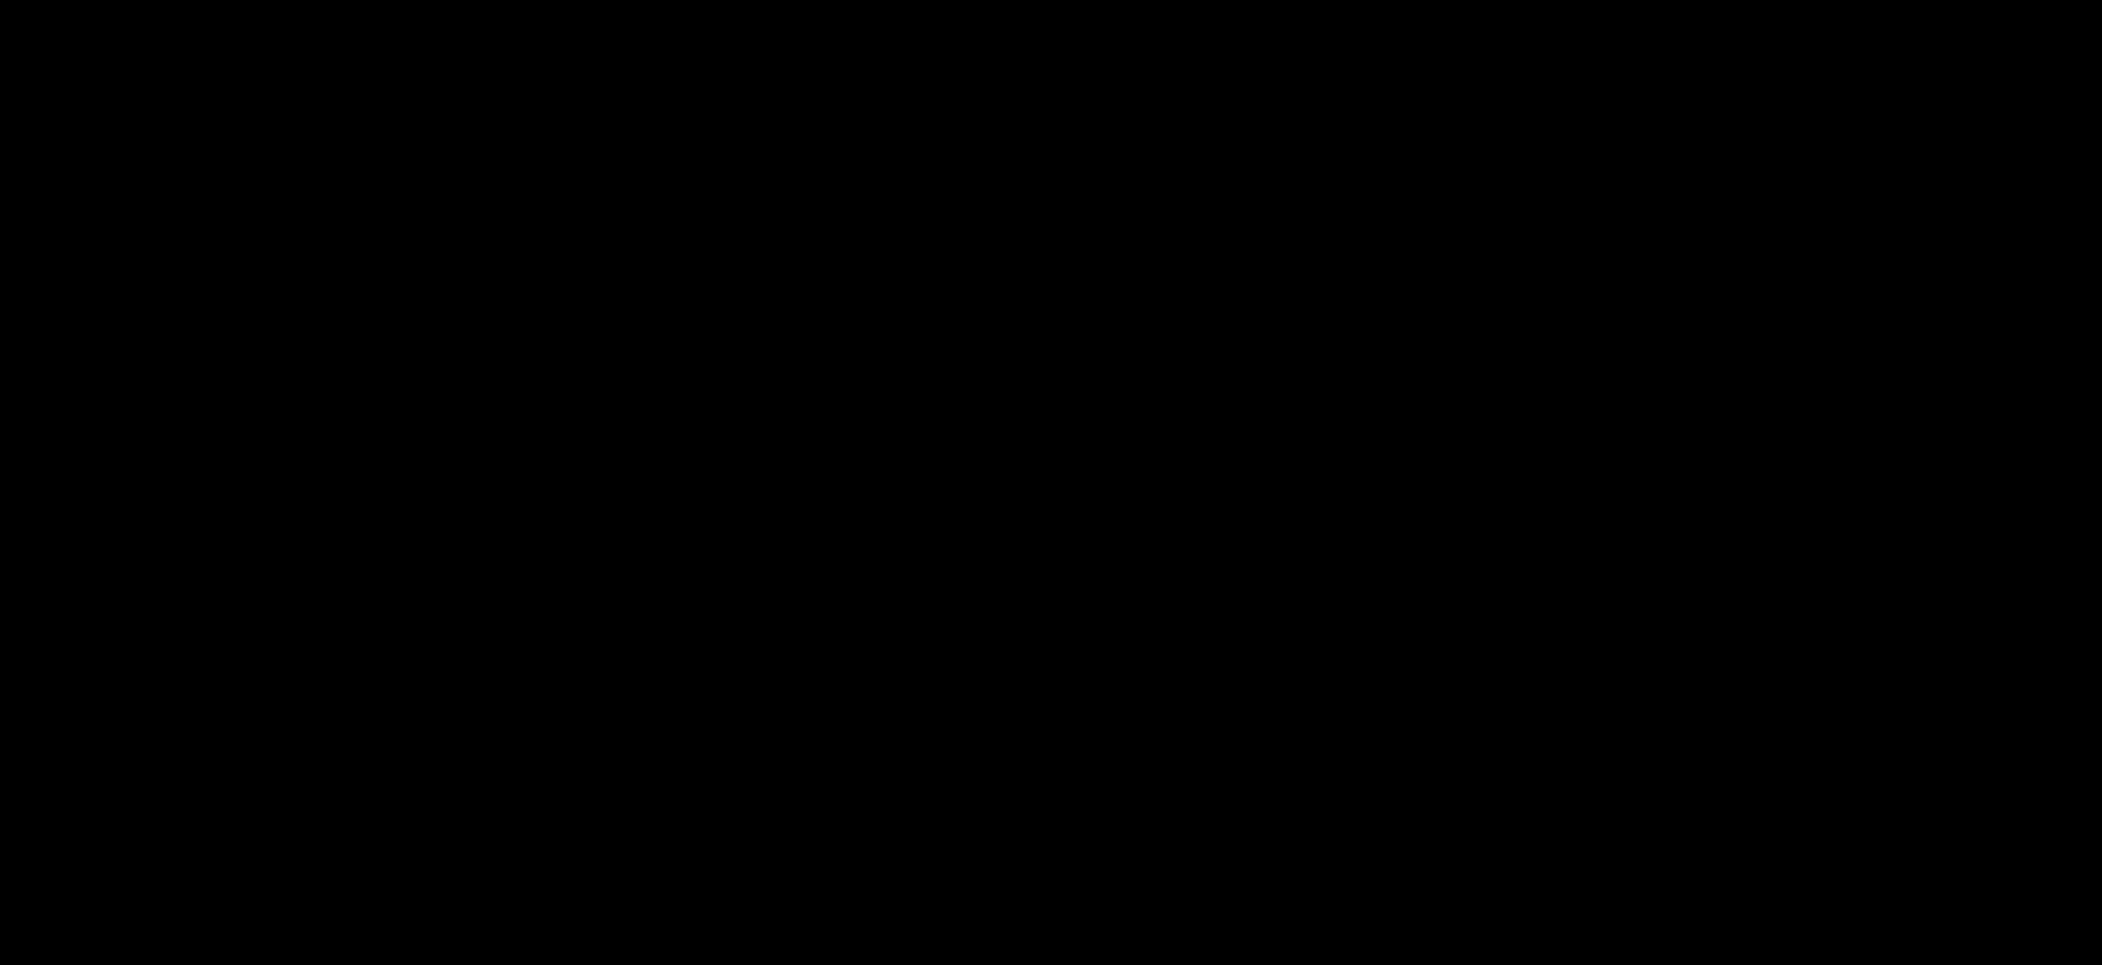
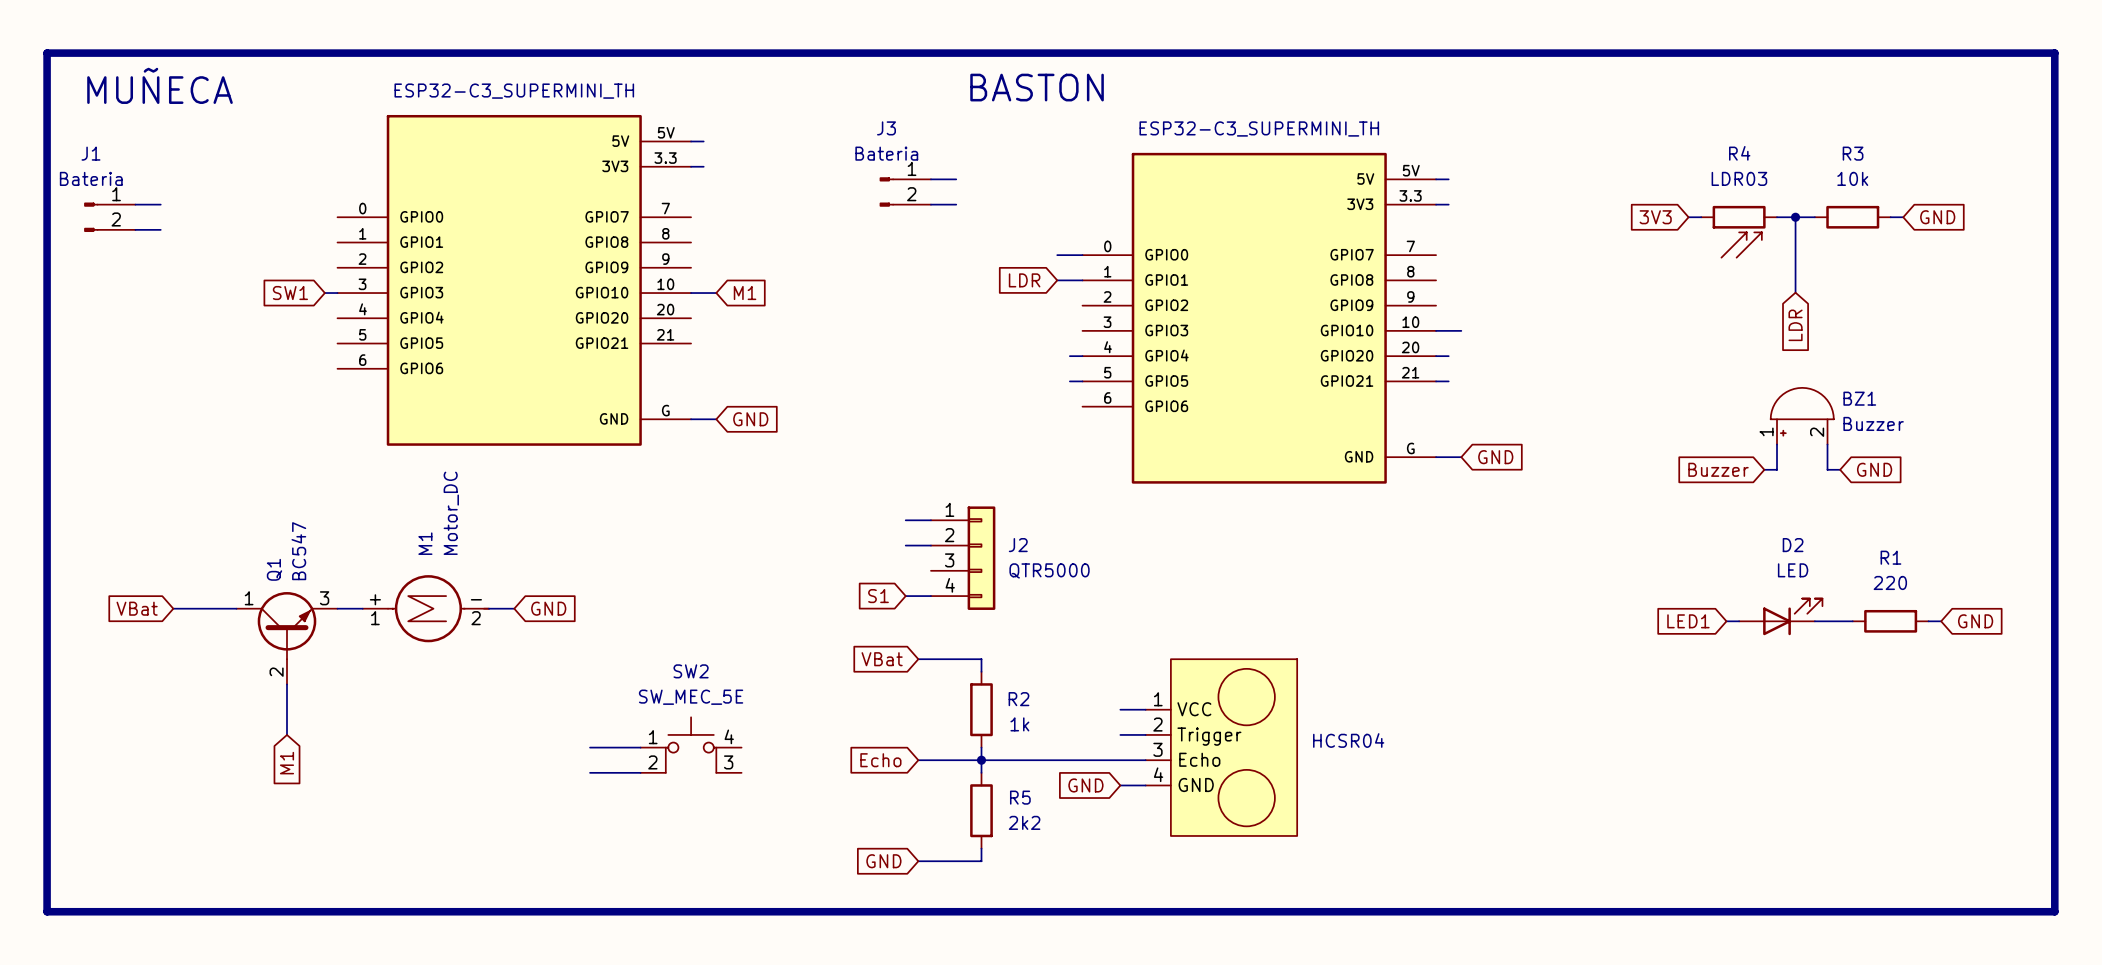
line: none -> (47, 53) (47, 911) (2054, 911) (2054, 53) (47, 53)
text: none -> MUÑECA (160, 85)
text: none -> BASTON (1037, 87)
wire: none -> (691, 141) (703, 141)
wire: none -> (691, 166) (703, 166)
wire: none -> (930, 179) (956, 179)
wire: none -> (1436, 179) (1448, 179)
J3: none -> Bateria (905, 192)
wire: none -> (135, 204) (160, 204)
wire: none -> (930, 204) (956, 204)
wire: none -> (1436, 204) (1448, 204)
J1: none -> Bateria (109, 217)
global label: none -> 3V3 (1655, 217)
wire: none -> (1688, 217) (1701, 217)
wire: none -> (1777, 217) (1814, 217)
wire: none -> (1795, 217) (1795, 292)
junction: none -> (1795, 217)
R3: none -> 10k (1852, 217)
wire: none -> (1890, 217) (1903, 217)
global label: none -> GND (1937, 217)
wire: none -> (135, 229) (160, 229)
R4: none -> LDR03 (1739, 231)
wire: none -> (1057, 255) (1082, 255)
part: none -> ESP32-C3_SUPERMINI_TH (514, 280)
global label: none -> LDR (1024, 280)
wire: none -> (1057, 280) (1082, 280)
global label: none -> SW1 (290, 293)
wire: none -> (324, 293) (337, 293)
wire: none -> (691, 293) (716, 293)
global label: none -> M1 (745, 293)
part: none -> ESP32-C3_SUPERMINI_TH (1259, 318)
global label: none -> LDR (1795, 325)
wire: none -> (1436, 330) (1461, 330)
wire: none -> (1069, 356) (1082, 356)
wire: none -> (1436, 356) (1448, 356)
wire: none -> (1069, 381) (1082, 381)
wire: none -> (1436, 381) (1448, 381)
BZ1: none -> Buzzer (1802, 416)
wire: none -> (691, 419) (716, 419)
global label: none -> GND (750, 419)
wire: none -> (1777, 444) (1777, 469) (1764, 469)
wire: none -> (1827, 444) (1827, 469) (1840, 469)
wire: none -> (1436, 457) (1461, 457)
global label: none -> GND (1495, 457)
global label: none -> Buzzer (1718, 469)
global label: none -> GND (1874, 469)
wire: none -> (905, 520) (930, 520)
wire: none -> (905, 545) (930, 545)
J2: none -> QTR5000 (963, 558)
global label: none -> S1 (878, 596)
wire: none -> (905, 596) (930, 596)
global label: none -> VBat (137, 608)
wire: none -> (173, 608) (236, 608)
wire: none -> (337, 608) (362, 608)
M1: none -> Motor_DC (425, 608)
wire: none -> (489, 608) (514, 608)
global label: none -> GND (548, 608)
D2: none -> LED (1780, 616)
global label: none -> LED1 (1688, 621)
wire: none -> (1726, 621) (1739, 621)
wire: none -> (1814, 621) (1852, 621)
R1: none -> 220 (1890, 621)
wire: none -> (1928, 621) (1941, 621)
global label: none -> GND (1975, 621)
Q1: none -> BC547 (287, 638)
global label: none -> VBat (882, 659)
wire: none -> (918, 659) (981, 659) (981, 671)
wire: none -> (287, 684) (287, 734)
R2: none -> 1k (981, 709)
wire: none -> (1120, 709) (1145, 709)
wire: none -> (1120, 734) (1145, 734)
SW2: none -> SW_MEC_5E (691, 745)
wire: none -> (590, 747) (640, 747)
wire: none -> (981, 747) (981, 772)
HCSR04: none -> (1221, 747)
global label: none -> Echo (880, 760)
wire: none -> (918, 760) (1145, 760)
junction: none -> (981, 760)
global label: none -> M1 (287, 763)
wire: none -> (590, 772) (640, 772)
global label: none -> GND (1085, 785)
wire: none -> (1120, 785) (1145, 785)
R5: none -> 2k2 (981, 810)
wire: none -> (981, 848) (981, 861) (918, 861)
global label: none -> GND (883, 861)

